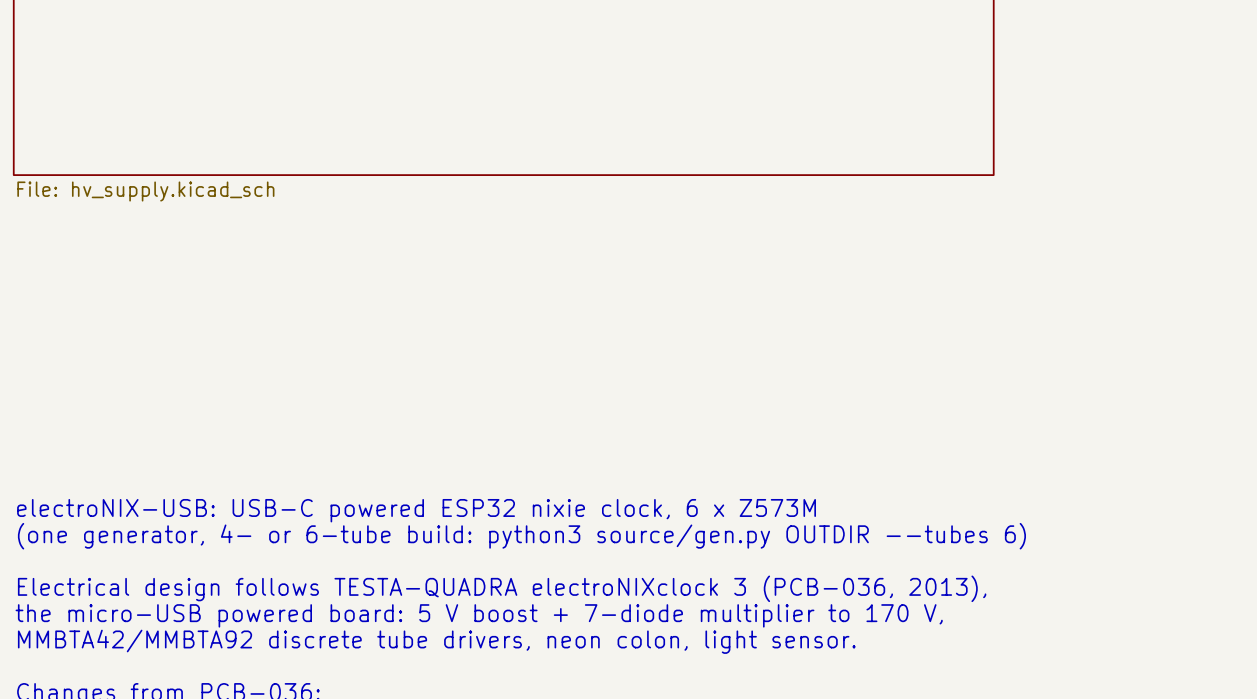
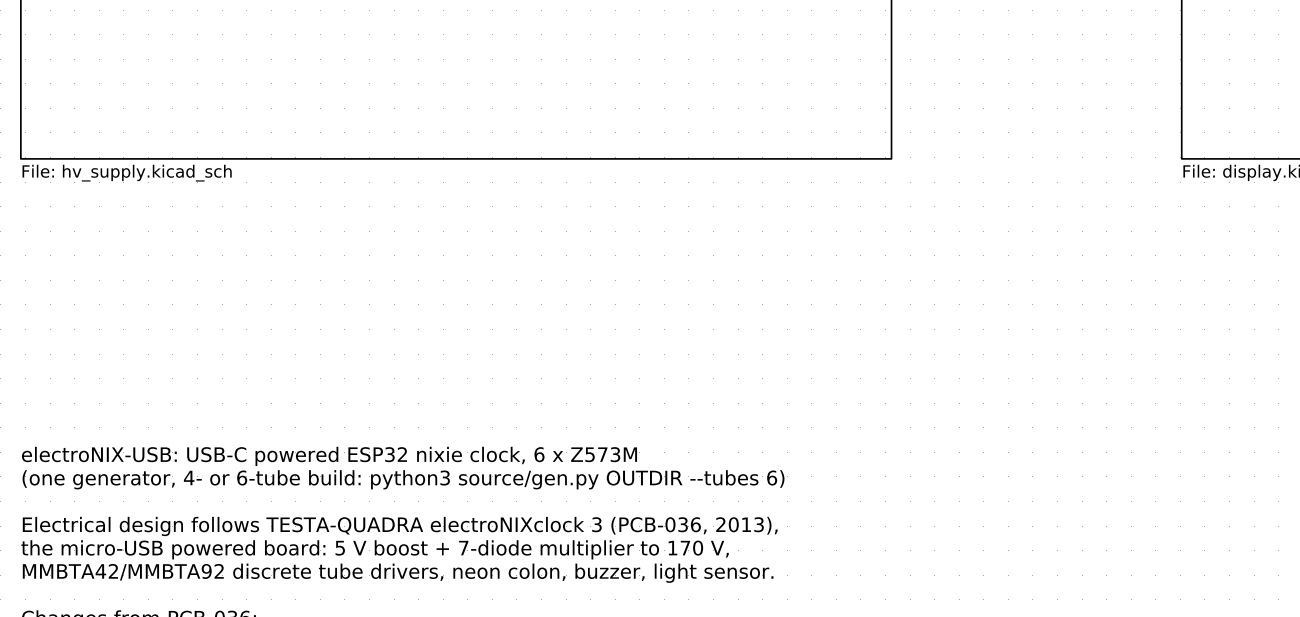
text: MMBTA42/MMBTA92 discrete tube drivers, neon colon, light sensor. (436, 641) -> MMBTA42/MMBTA92 discrete tube drivers, neon colon, buzzer, light sensor. (398, 573)

